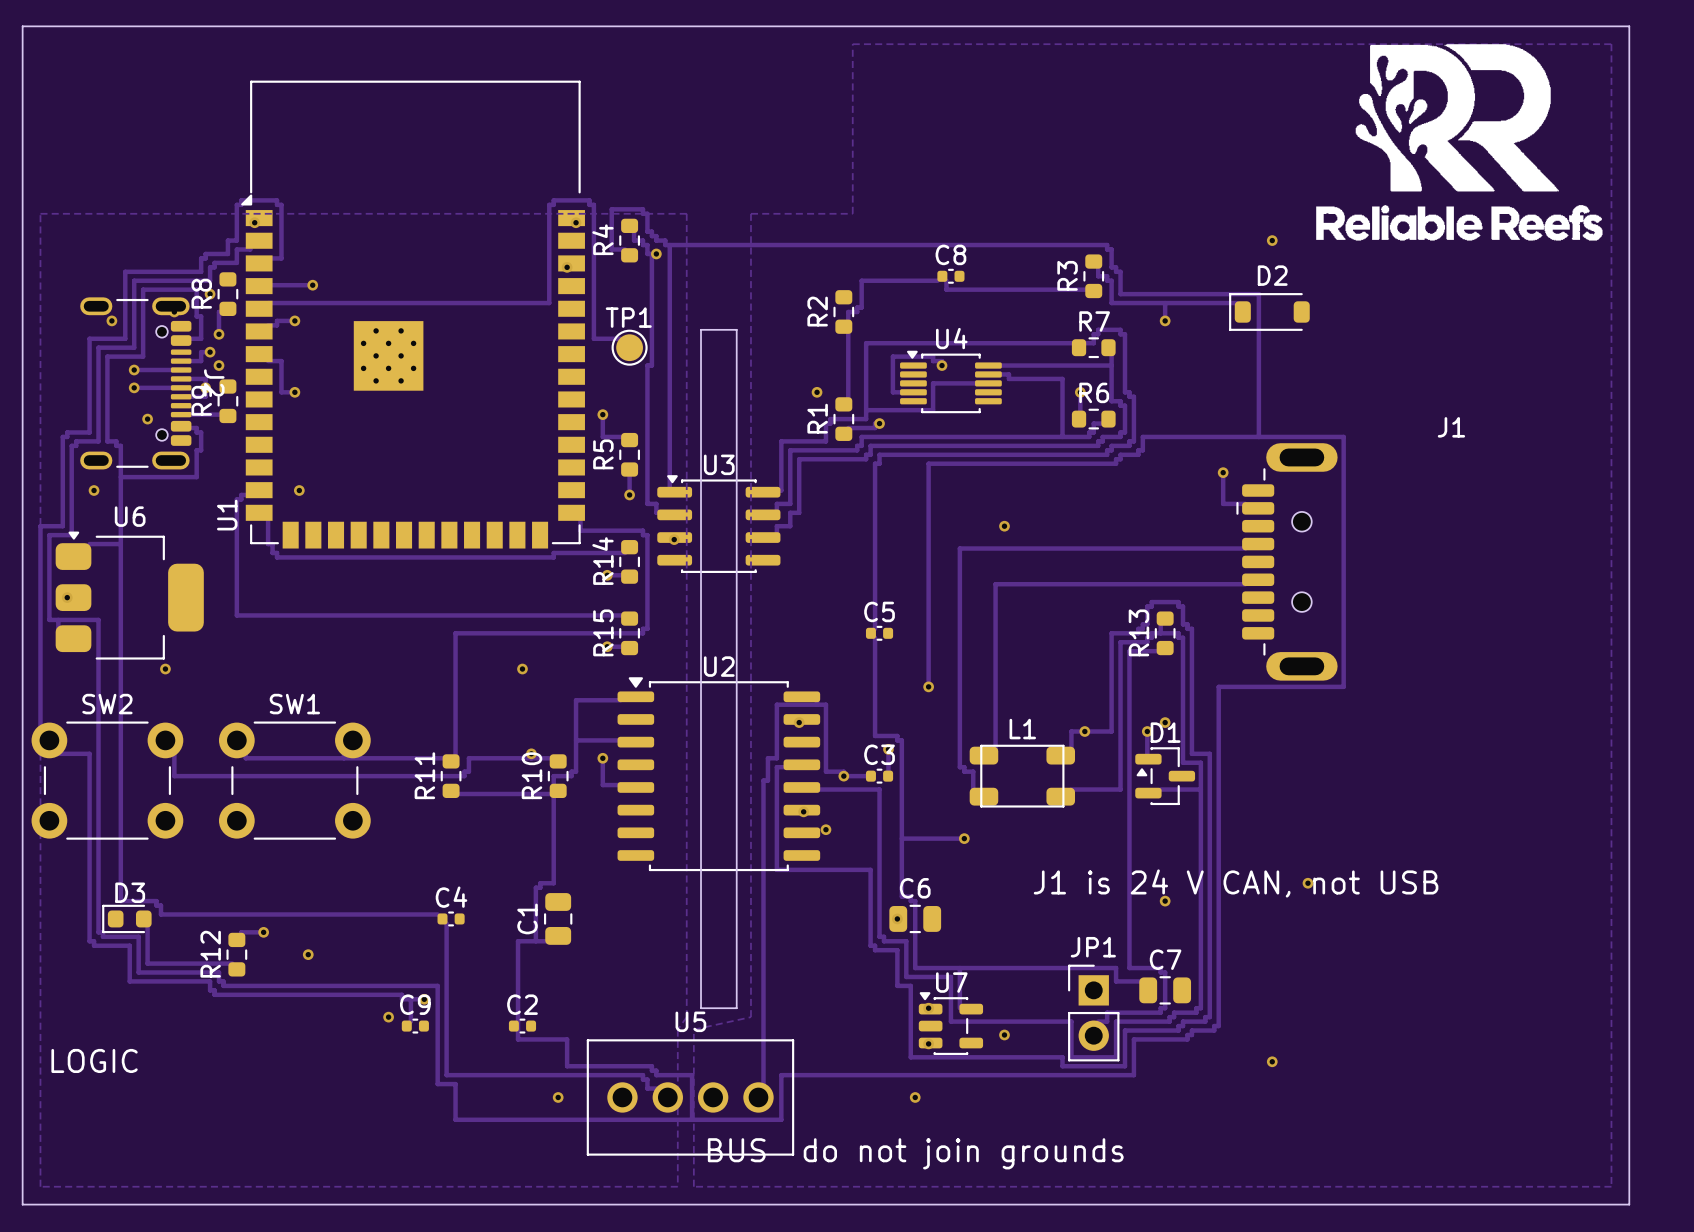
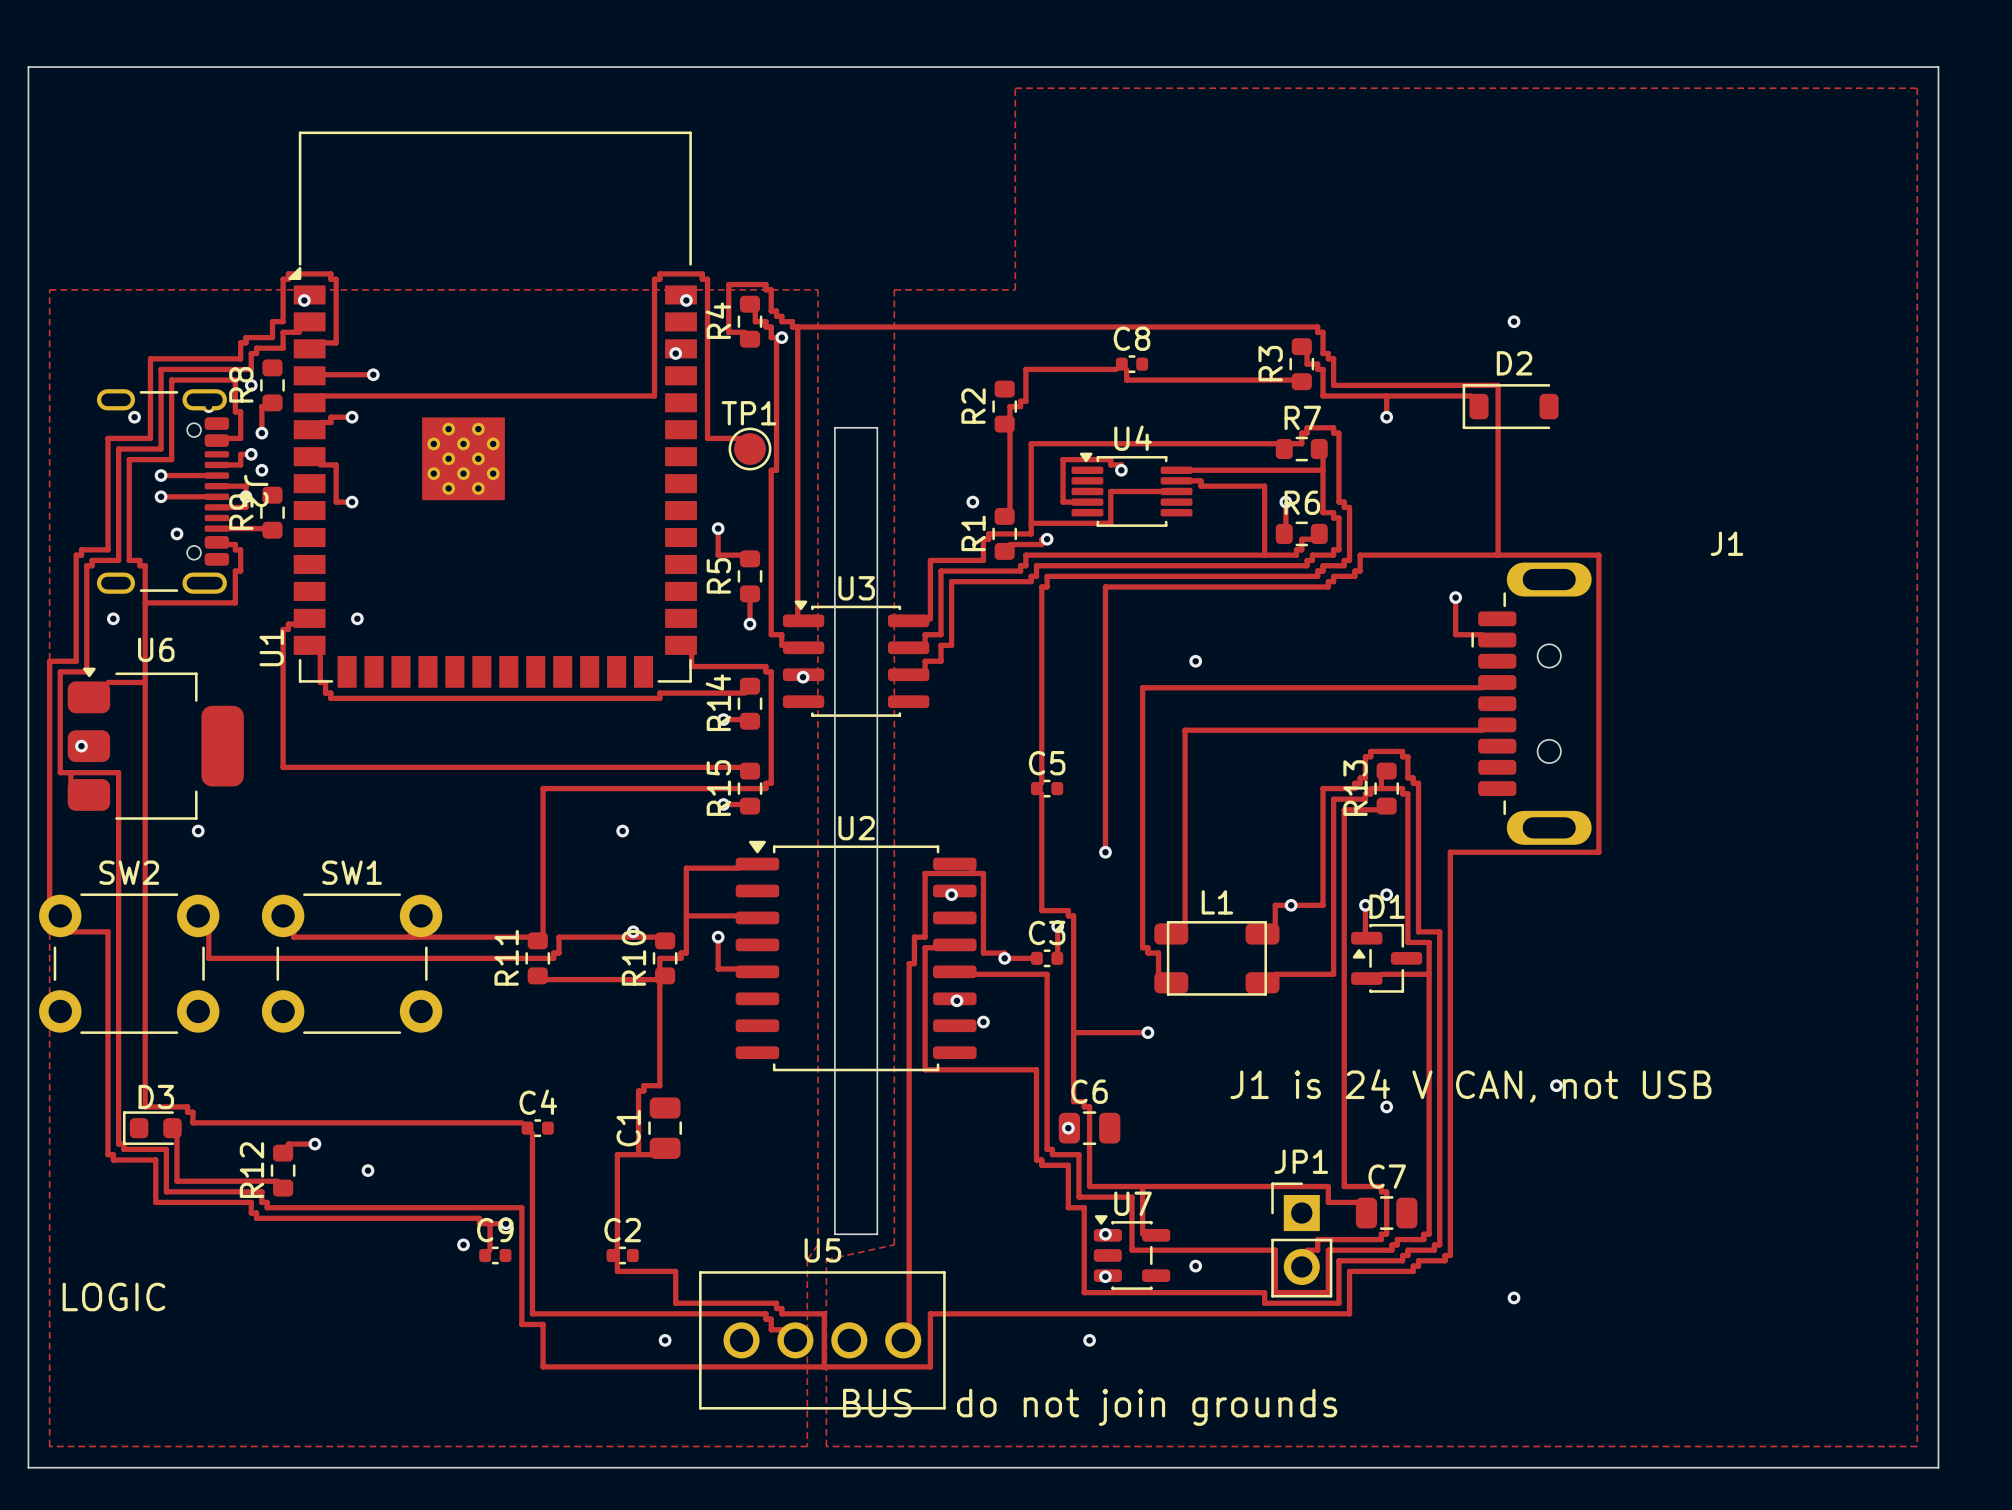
drawing: [1316, 44, 1603, 241] -> none

